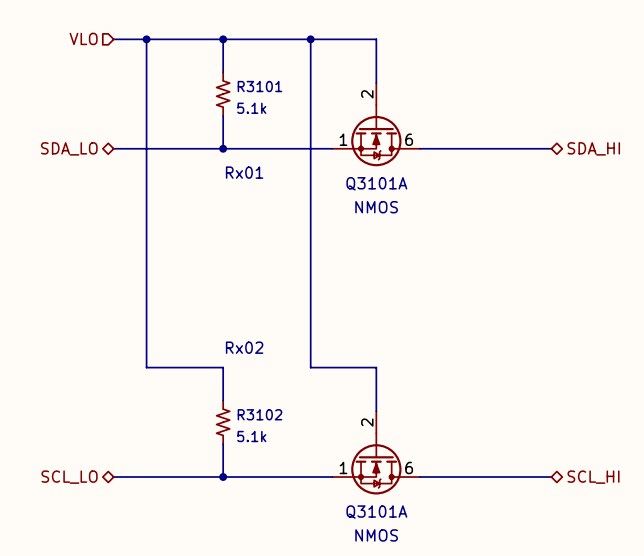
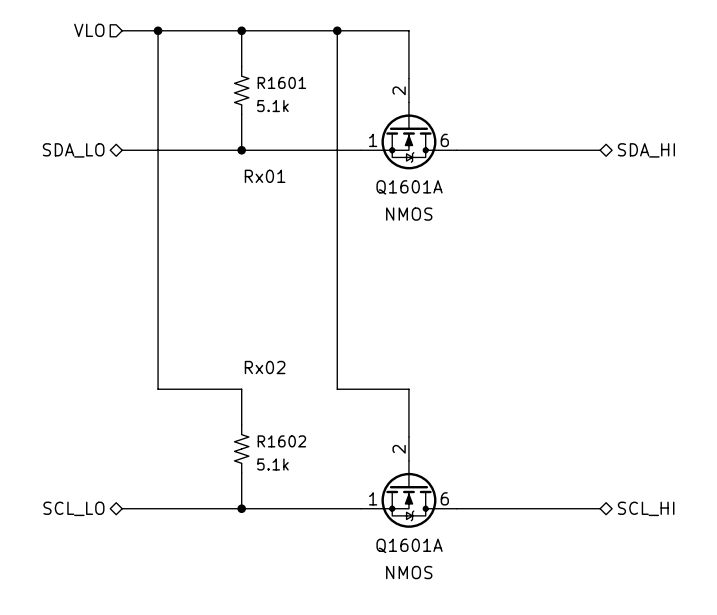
R3101 name: R3101 (259, 86) -> R1601 (281, 82)
Q3101A name: Q3101A (376, 183) -> Q1601A (409, 187)
R3102 name: R3102 (259, 414) -> R1602 (281, 441)
Q3101A name: Q3101A (376, 512) -> Q1601A (409, 545)

